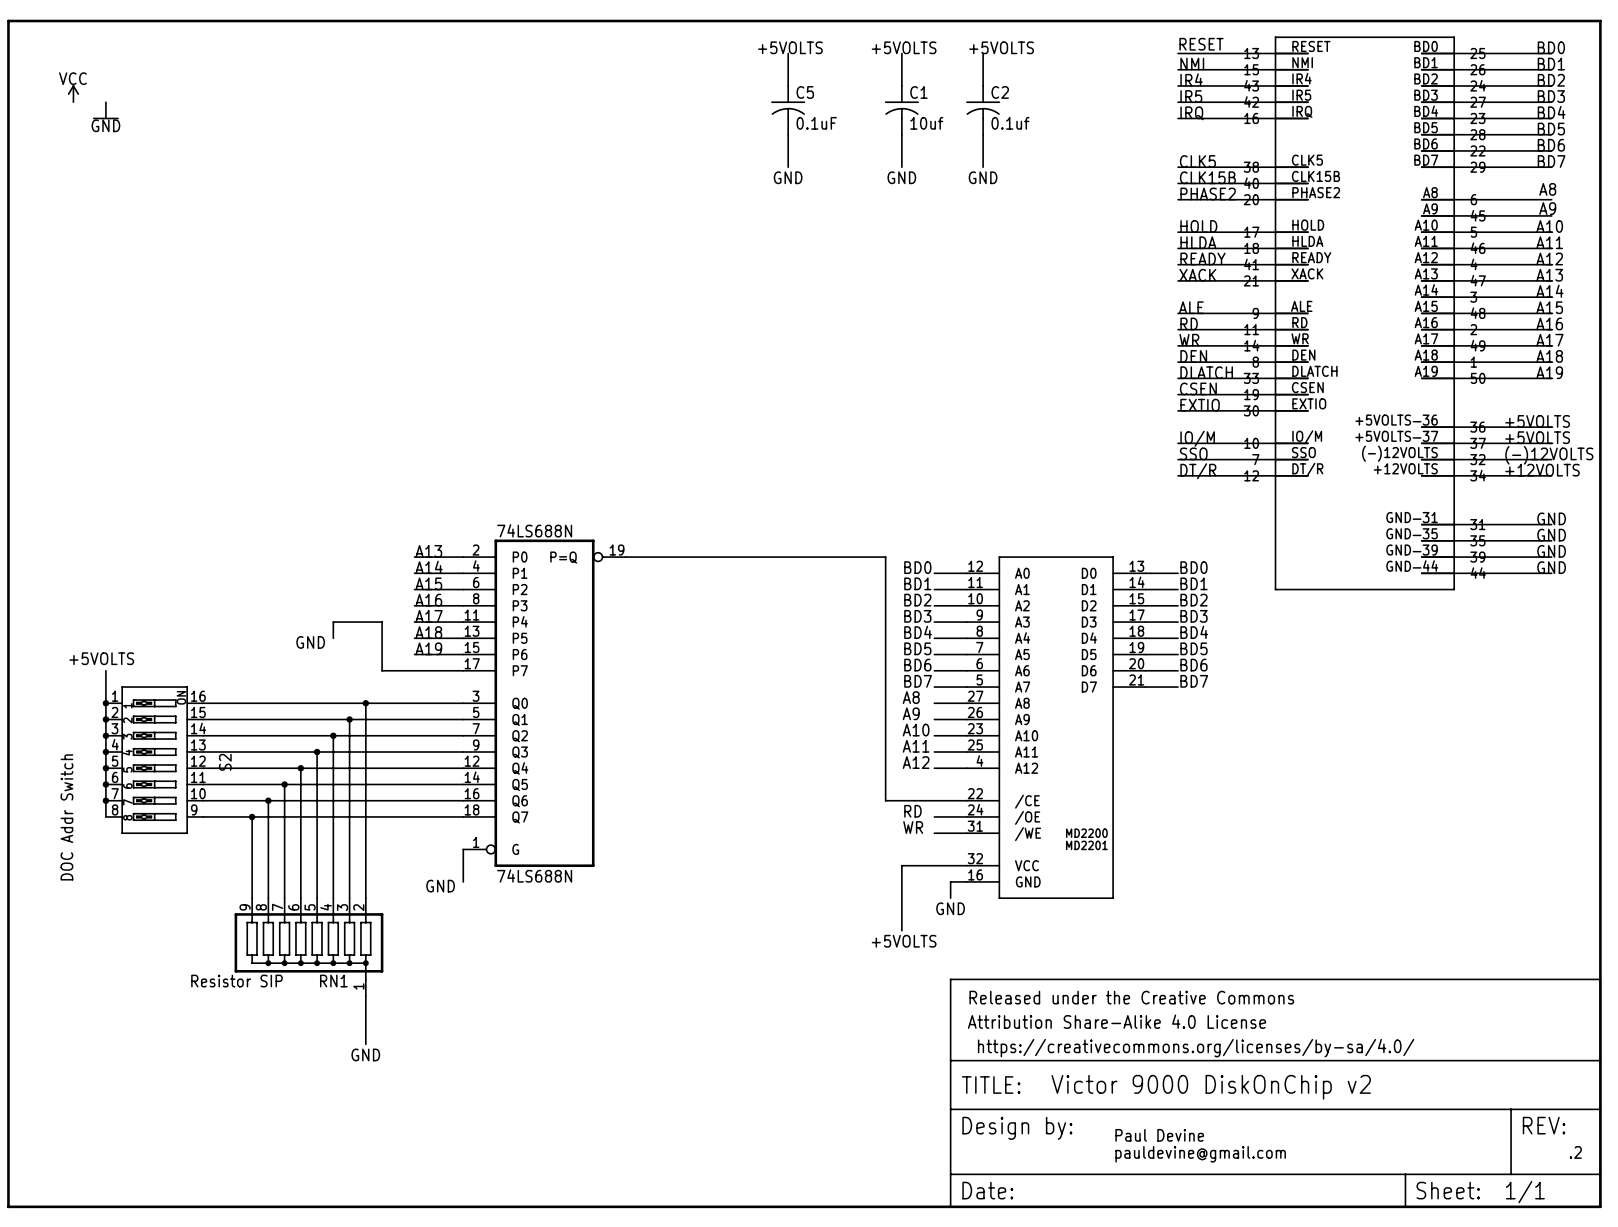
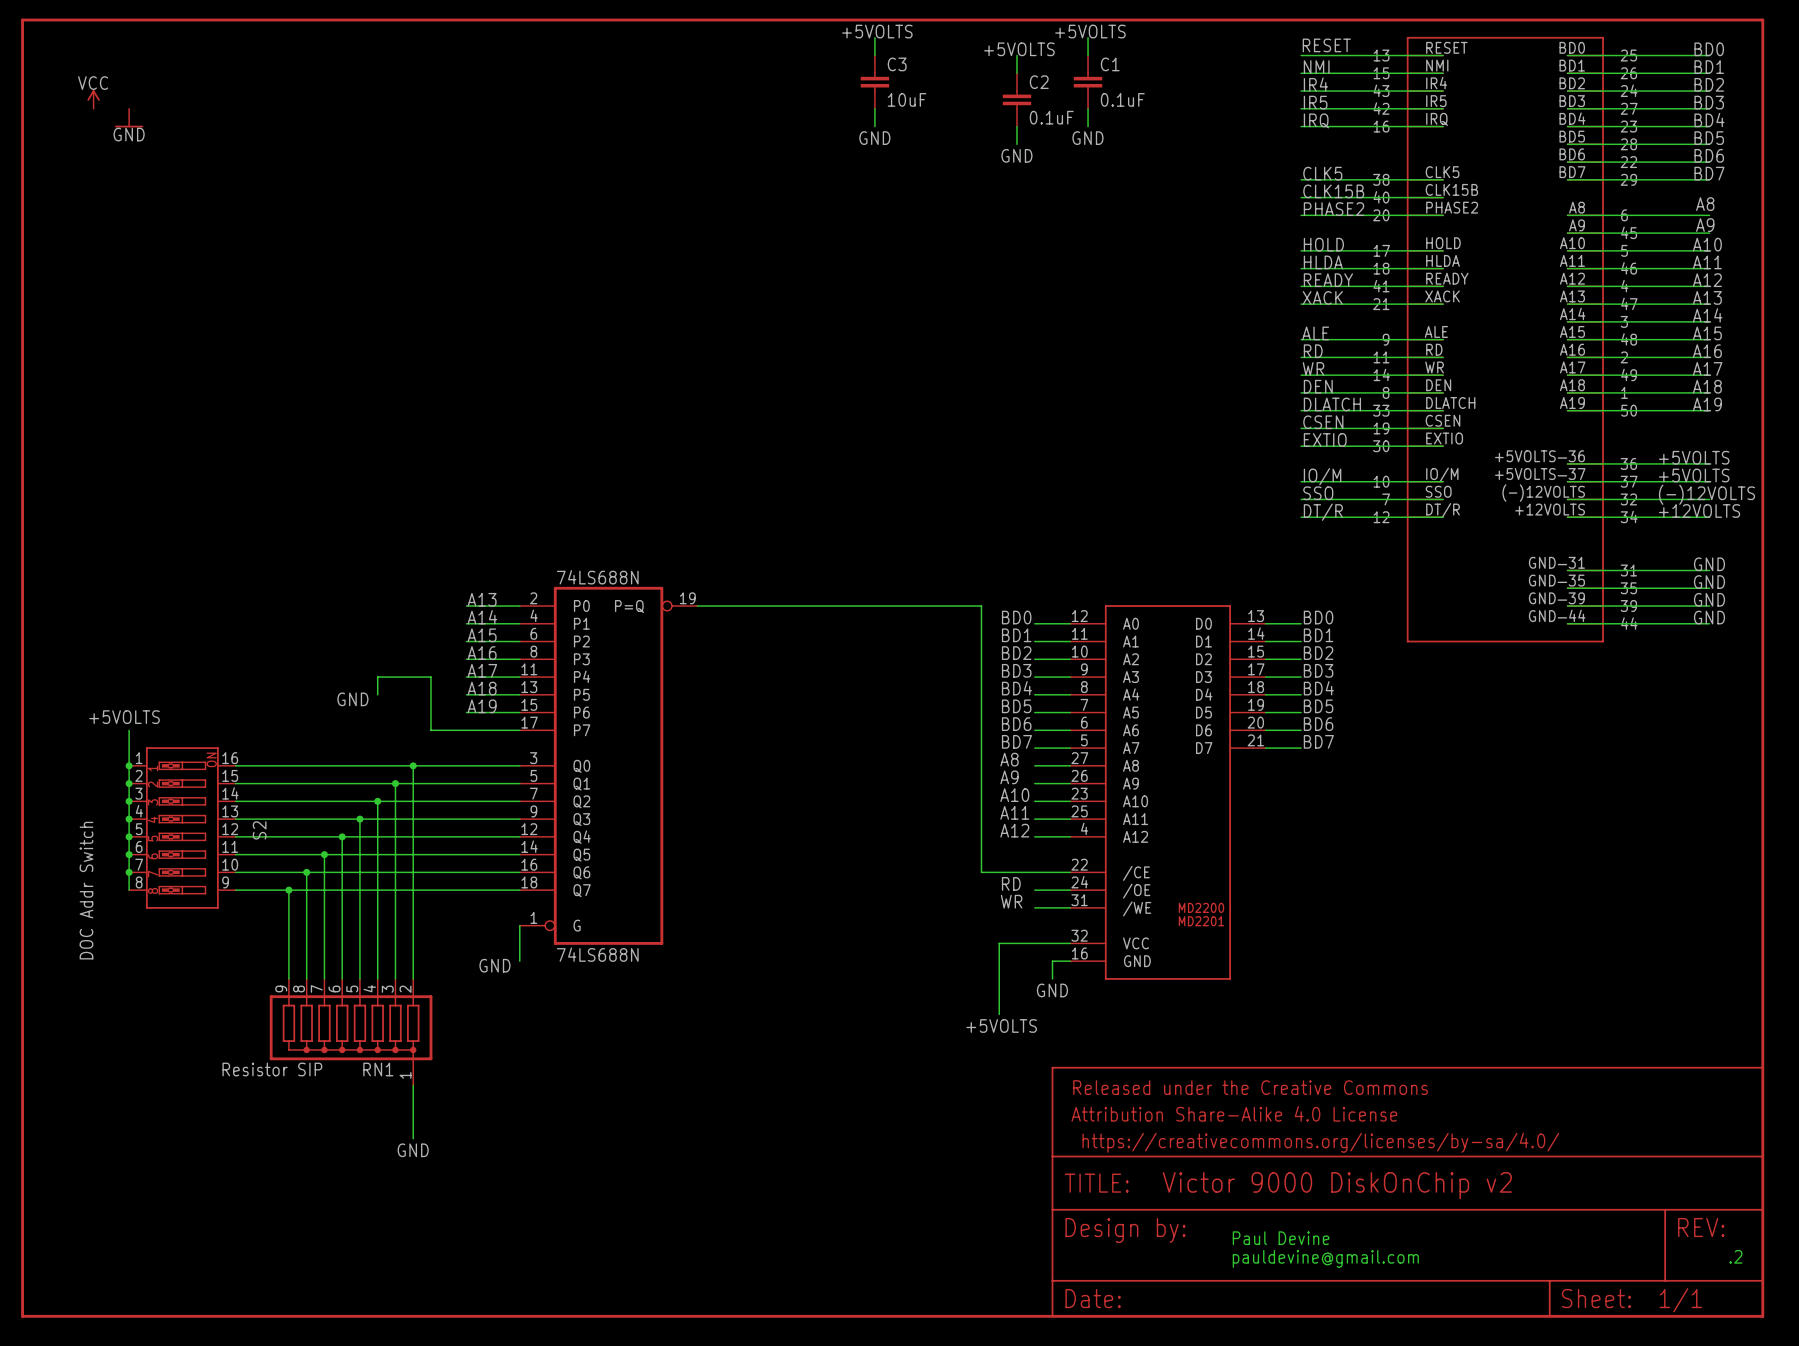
label position: +5VOLTS (790, 47) -> +5VOLTS (877, 31)
label position: +5VOLTS (904, 47) -> +5VOLTS (1019, 49)
label position: +5VOLTS (1001, 47) -> +5VOLTS (1090, 31)
wire: (901, 53) (901, 85) -> none
wire: none -> (1016, 55) (1016, 73)
C3: none -> 10uF (874, 82)
C1 symbol: [884, 85, 919, 135] -> [1073, 55, 1103, 109]
C2 symbol: [966, 85, 1001, 135] -> [1002, 73, 1032, 127]
C5: 0.1uF (788, 110) -> none
wire: none -> (1016, 126) (1016, 144)
C1 value: 10uf (926, 123) -> 0.1uF (1122, 99)
C2 value: 0.1uf (1010, 123) -> 0.1uF (1051, 117)
label: none -> GND (1087, 138)
wire: (788, 134) (788, 167) -> none
wire: (901, 134) (901, 167) -> none
wire: (983, 134) (983, 167) -> none
label: none -> GND (1016, 155)
label position: GND (788, 177) -> GND (874, 138)
label: GND (901, 177) -> none
label: GND (983, 177) -> none

